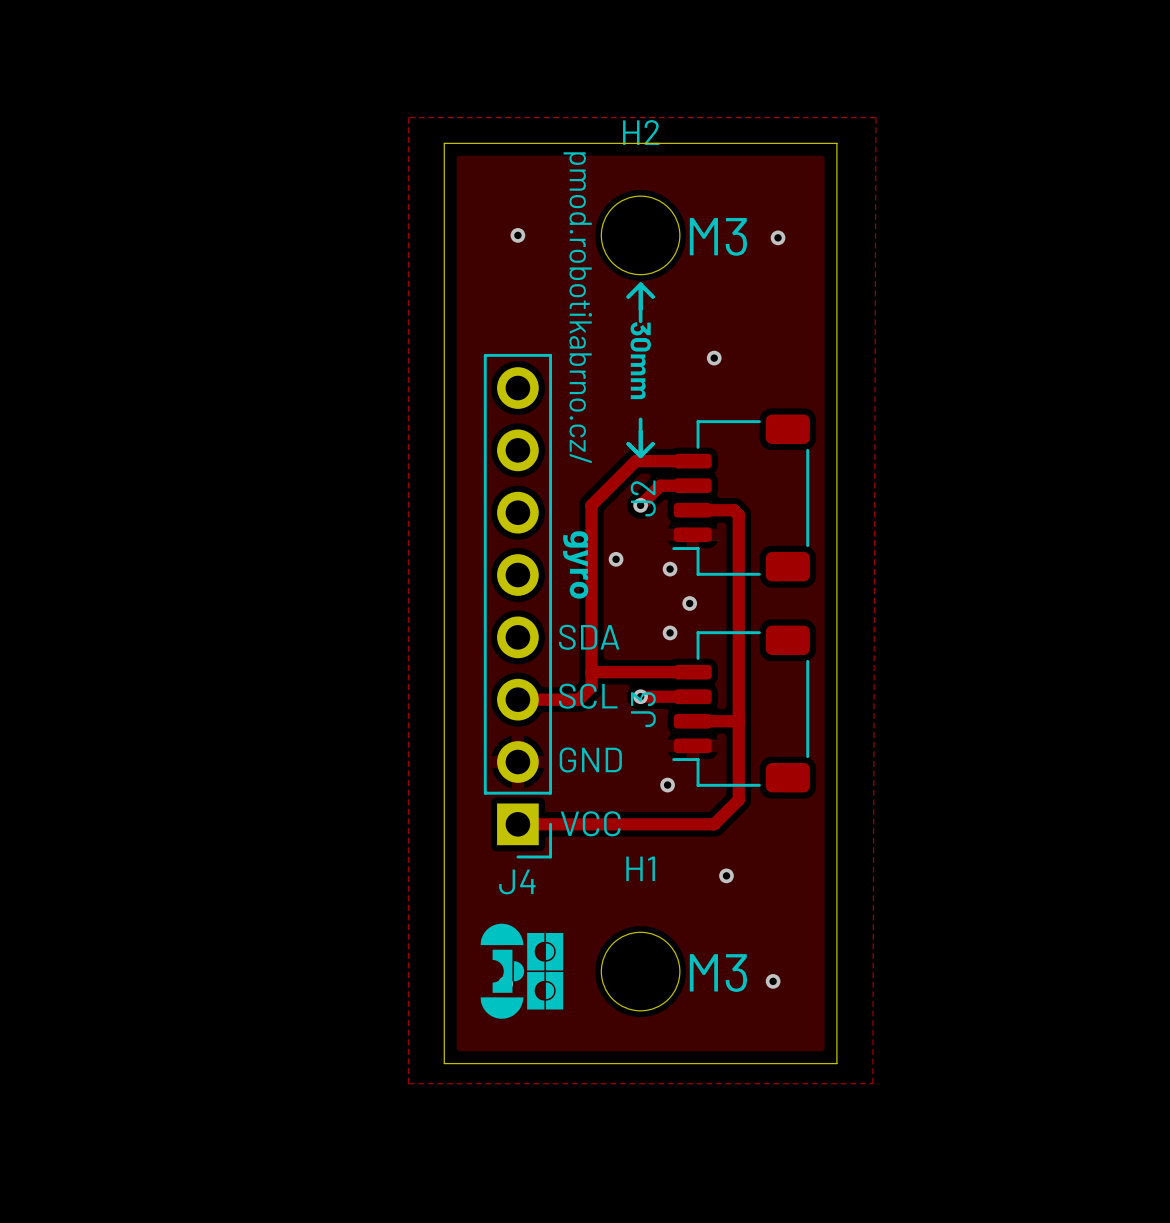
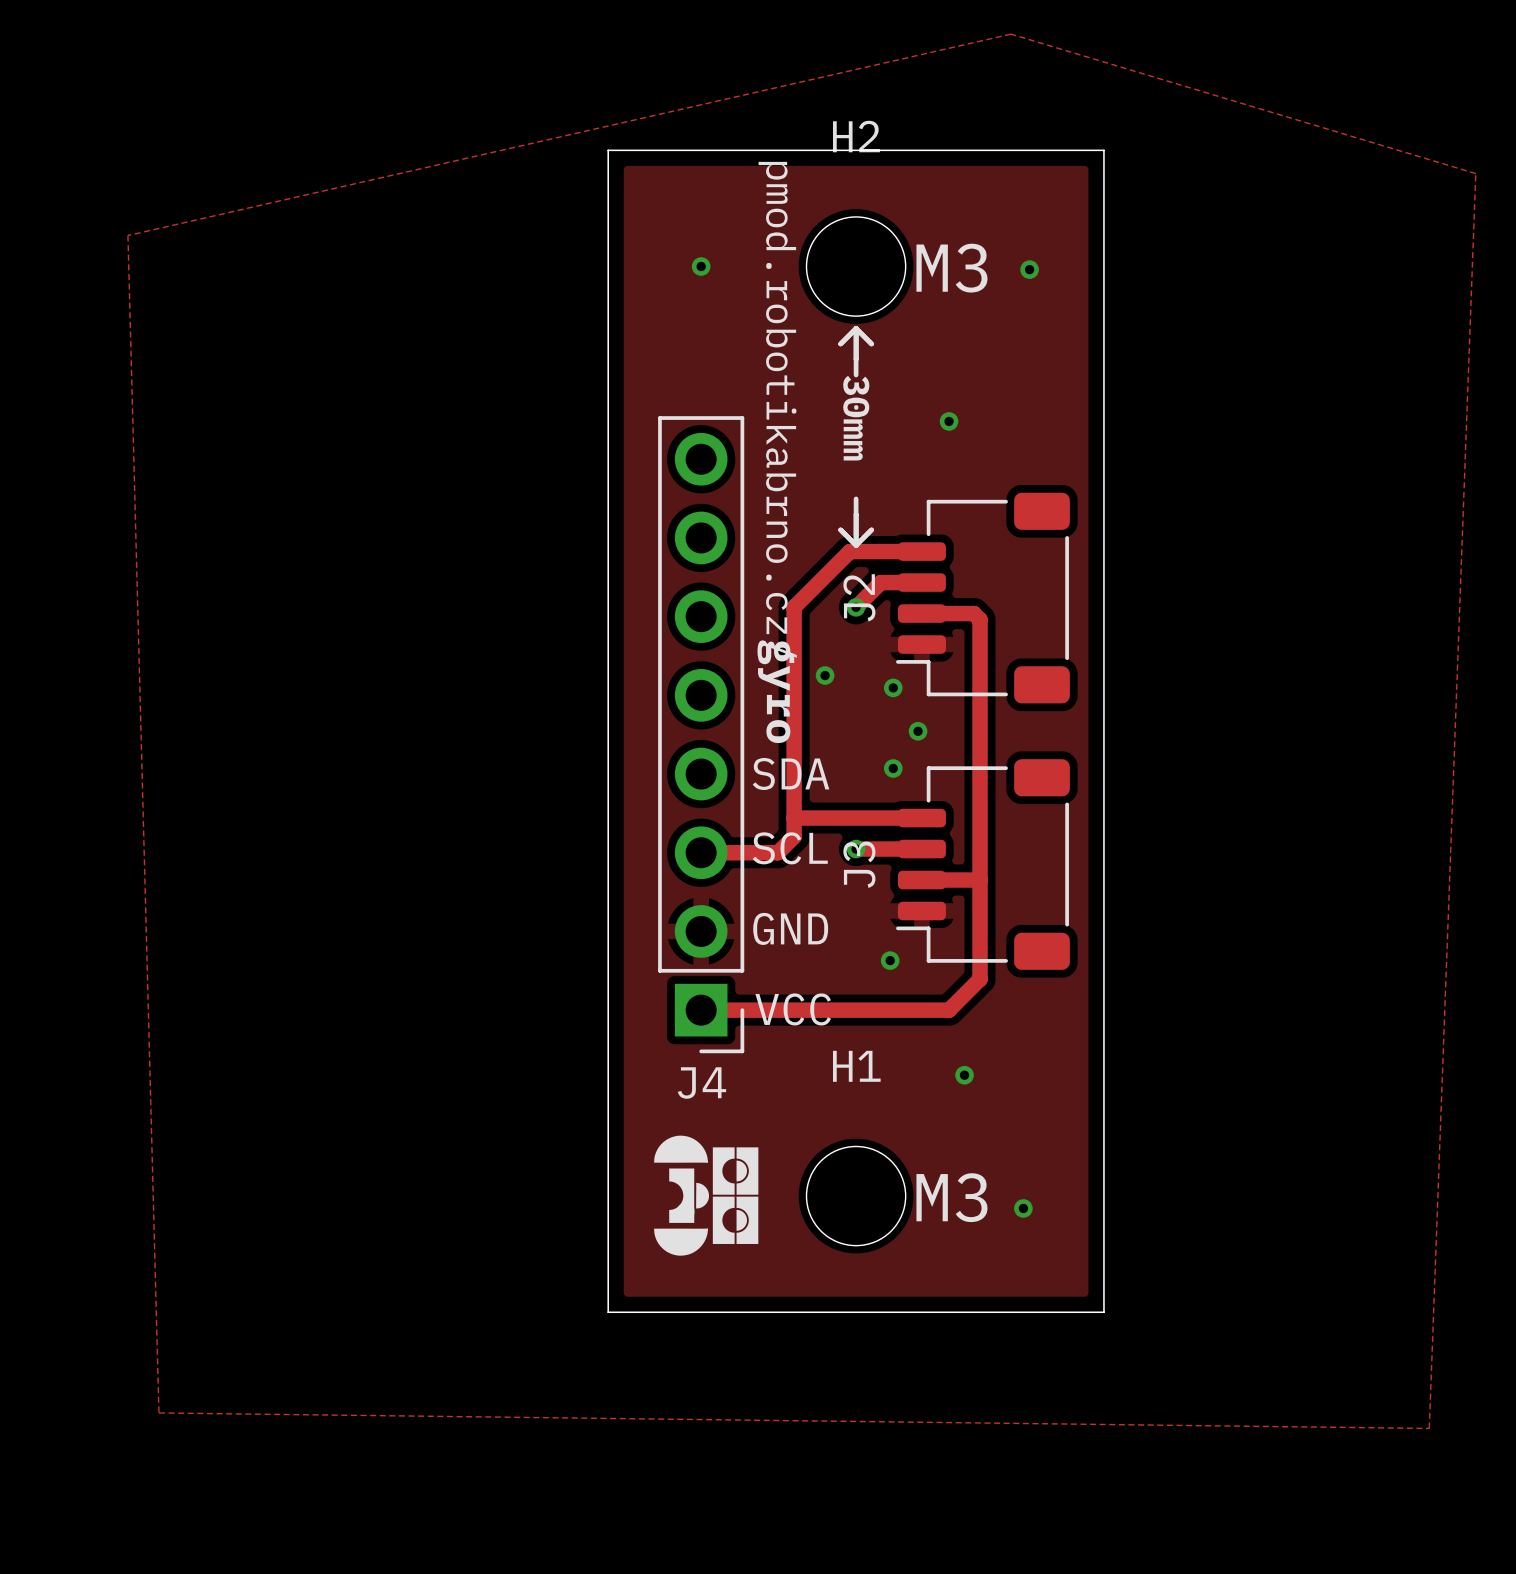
zone outline: none -> (1011, 34) (1475, 173) (1429, 1428) (158, 1412) (127, 235) (1011, 34)
zone outline: (408, 117) (875, 117) (872, 1083) (408, 1083) (408, 117) -> none

